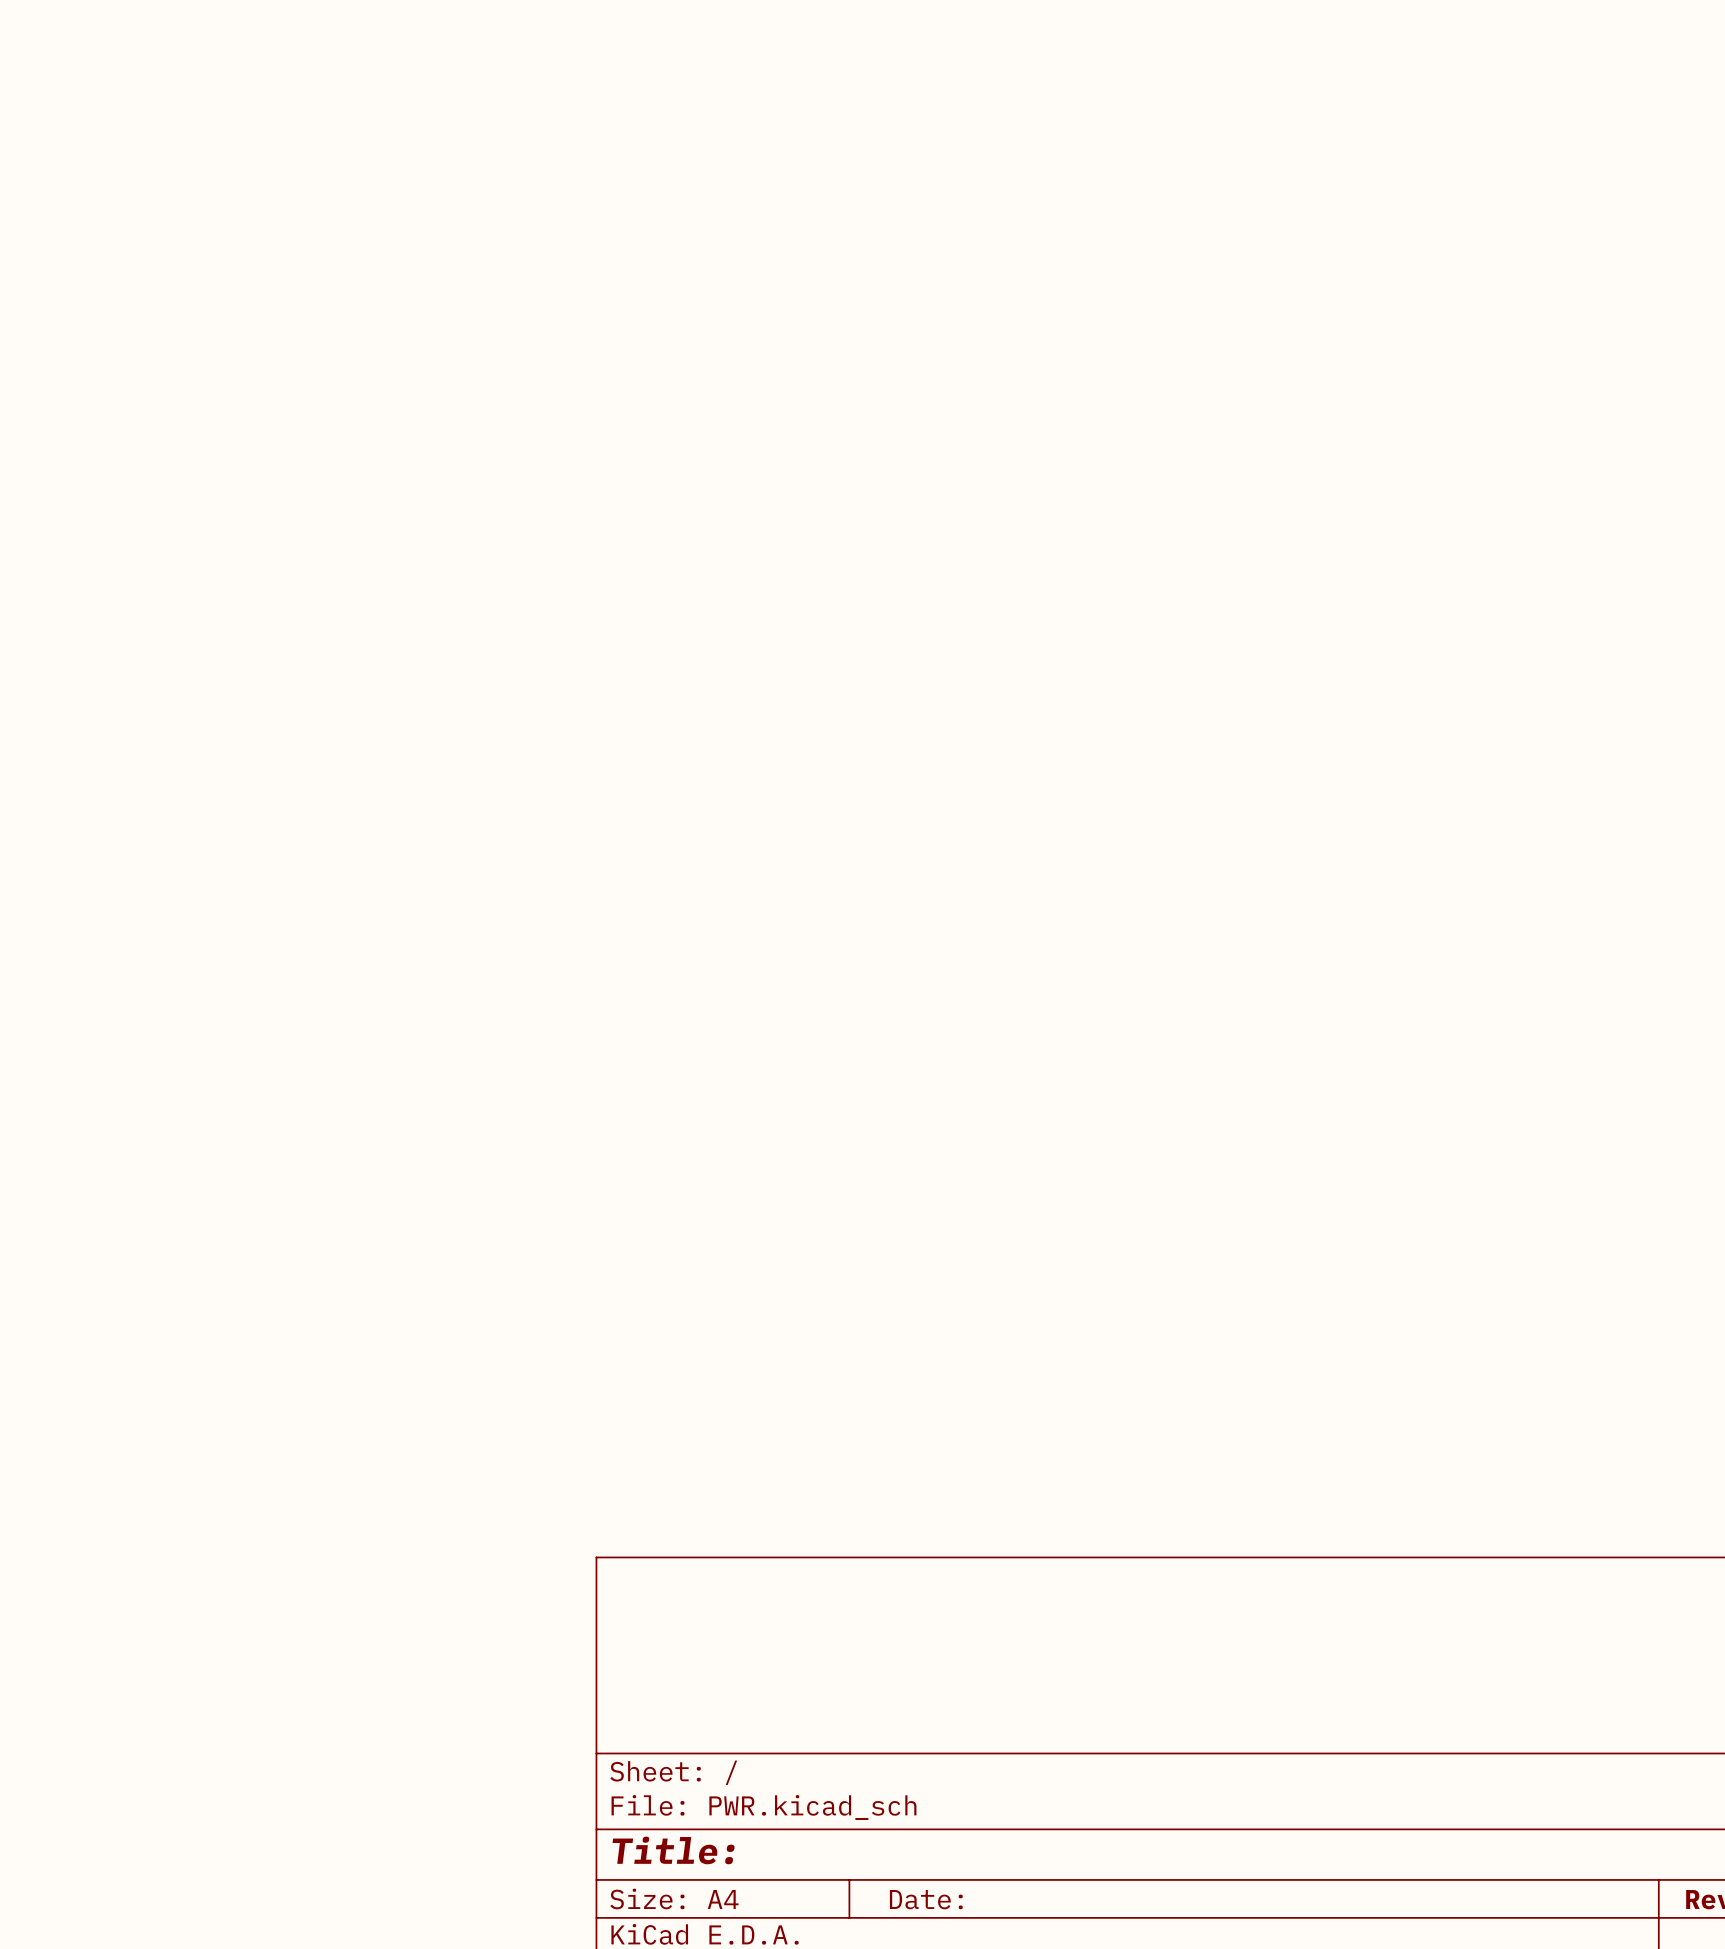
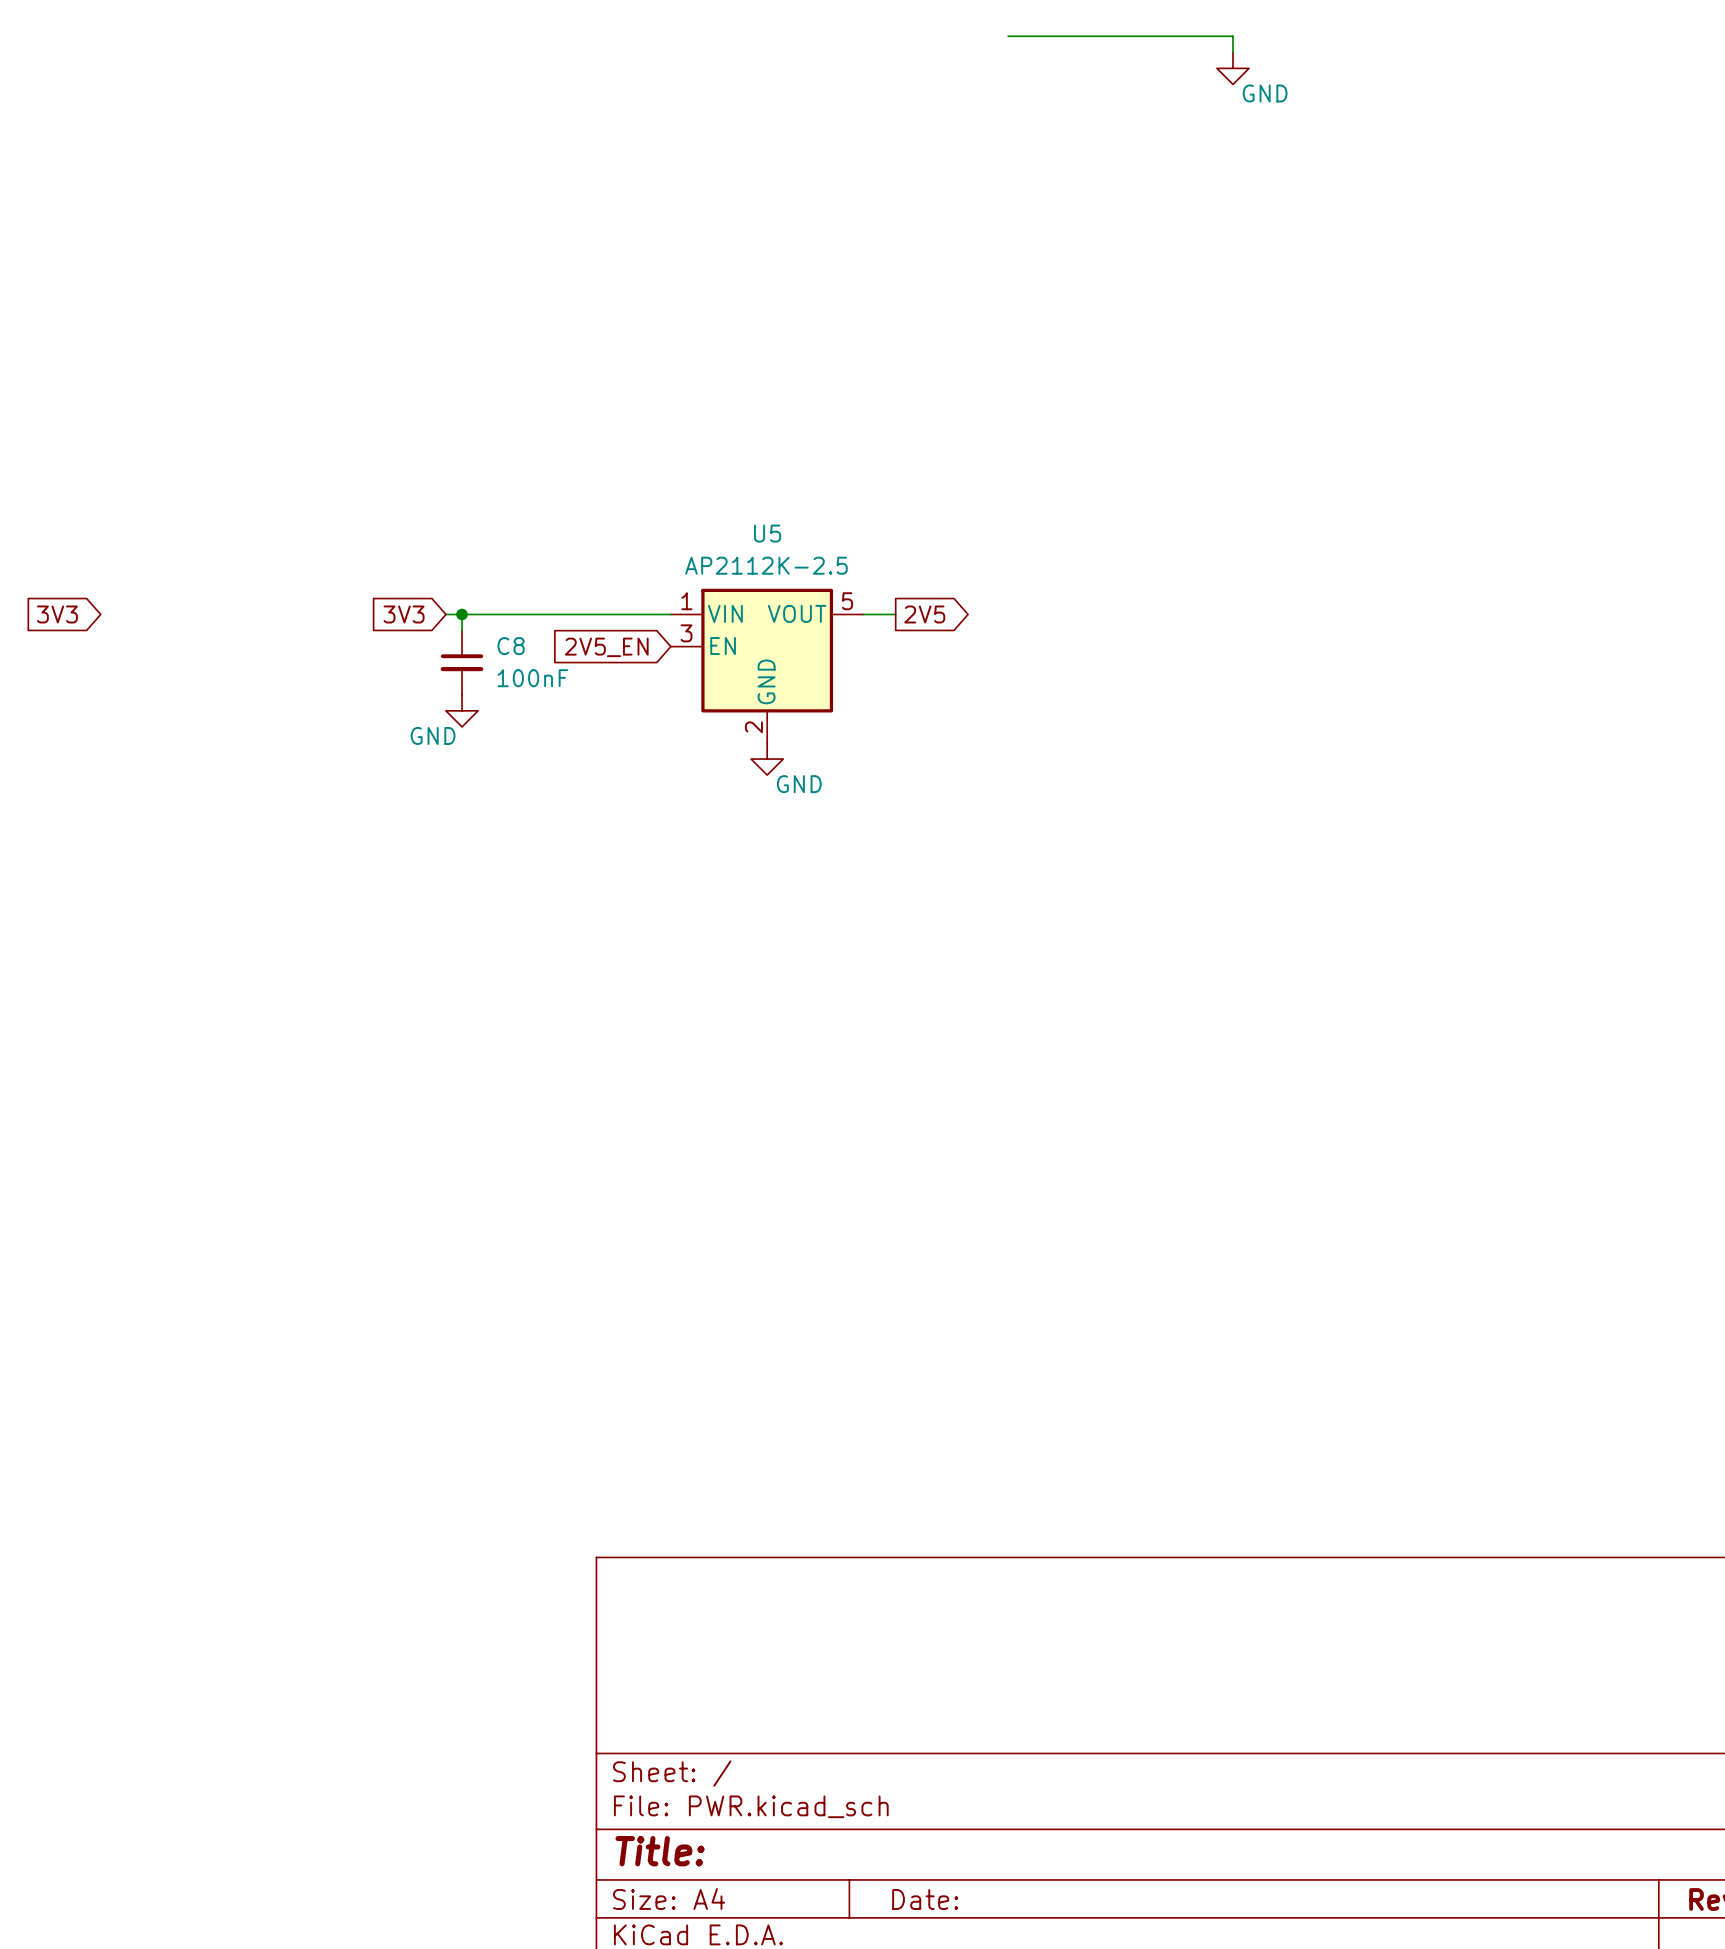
wire: none -> (1008, 36) (1232, 36) (1232, 52)
power symbol: none -> GND (1232, 68)
global label: none -> 3V3 (57, 614)
global label: none -> 3V3 (404, 614)
wire: none -> (445, 614) (670, 614)
wire: none -> (462, 614) (462, 630)
junction: none -> (462, 614)
wire: none -> (863, 614) (895, 614)
global label: none -> 2V5 (924, 614)
global label: none -> 2V5_EN (606, 647)
C8: none -> 100nF (462, 662)
U5: none -> AP2112K-2.5 (767, 665)
power symbol: none -> GND (462, 710)
power symbol: none -> GND (767, 759)

